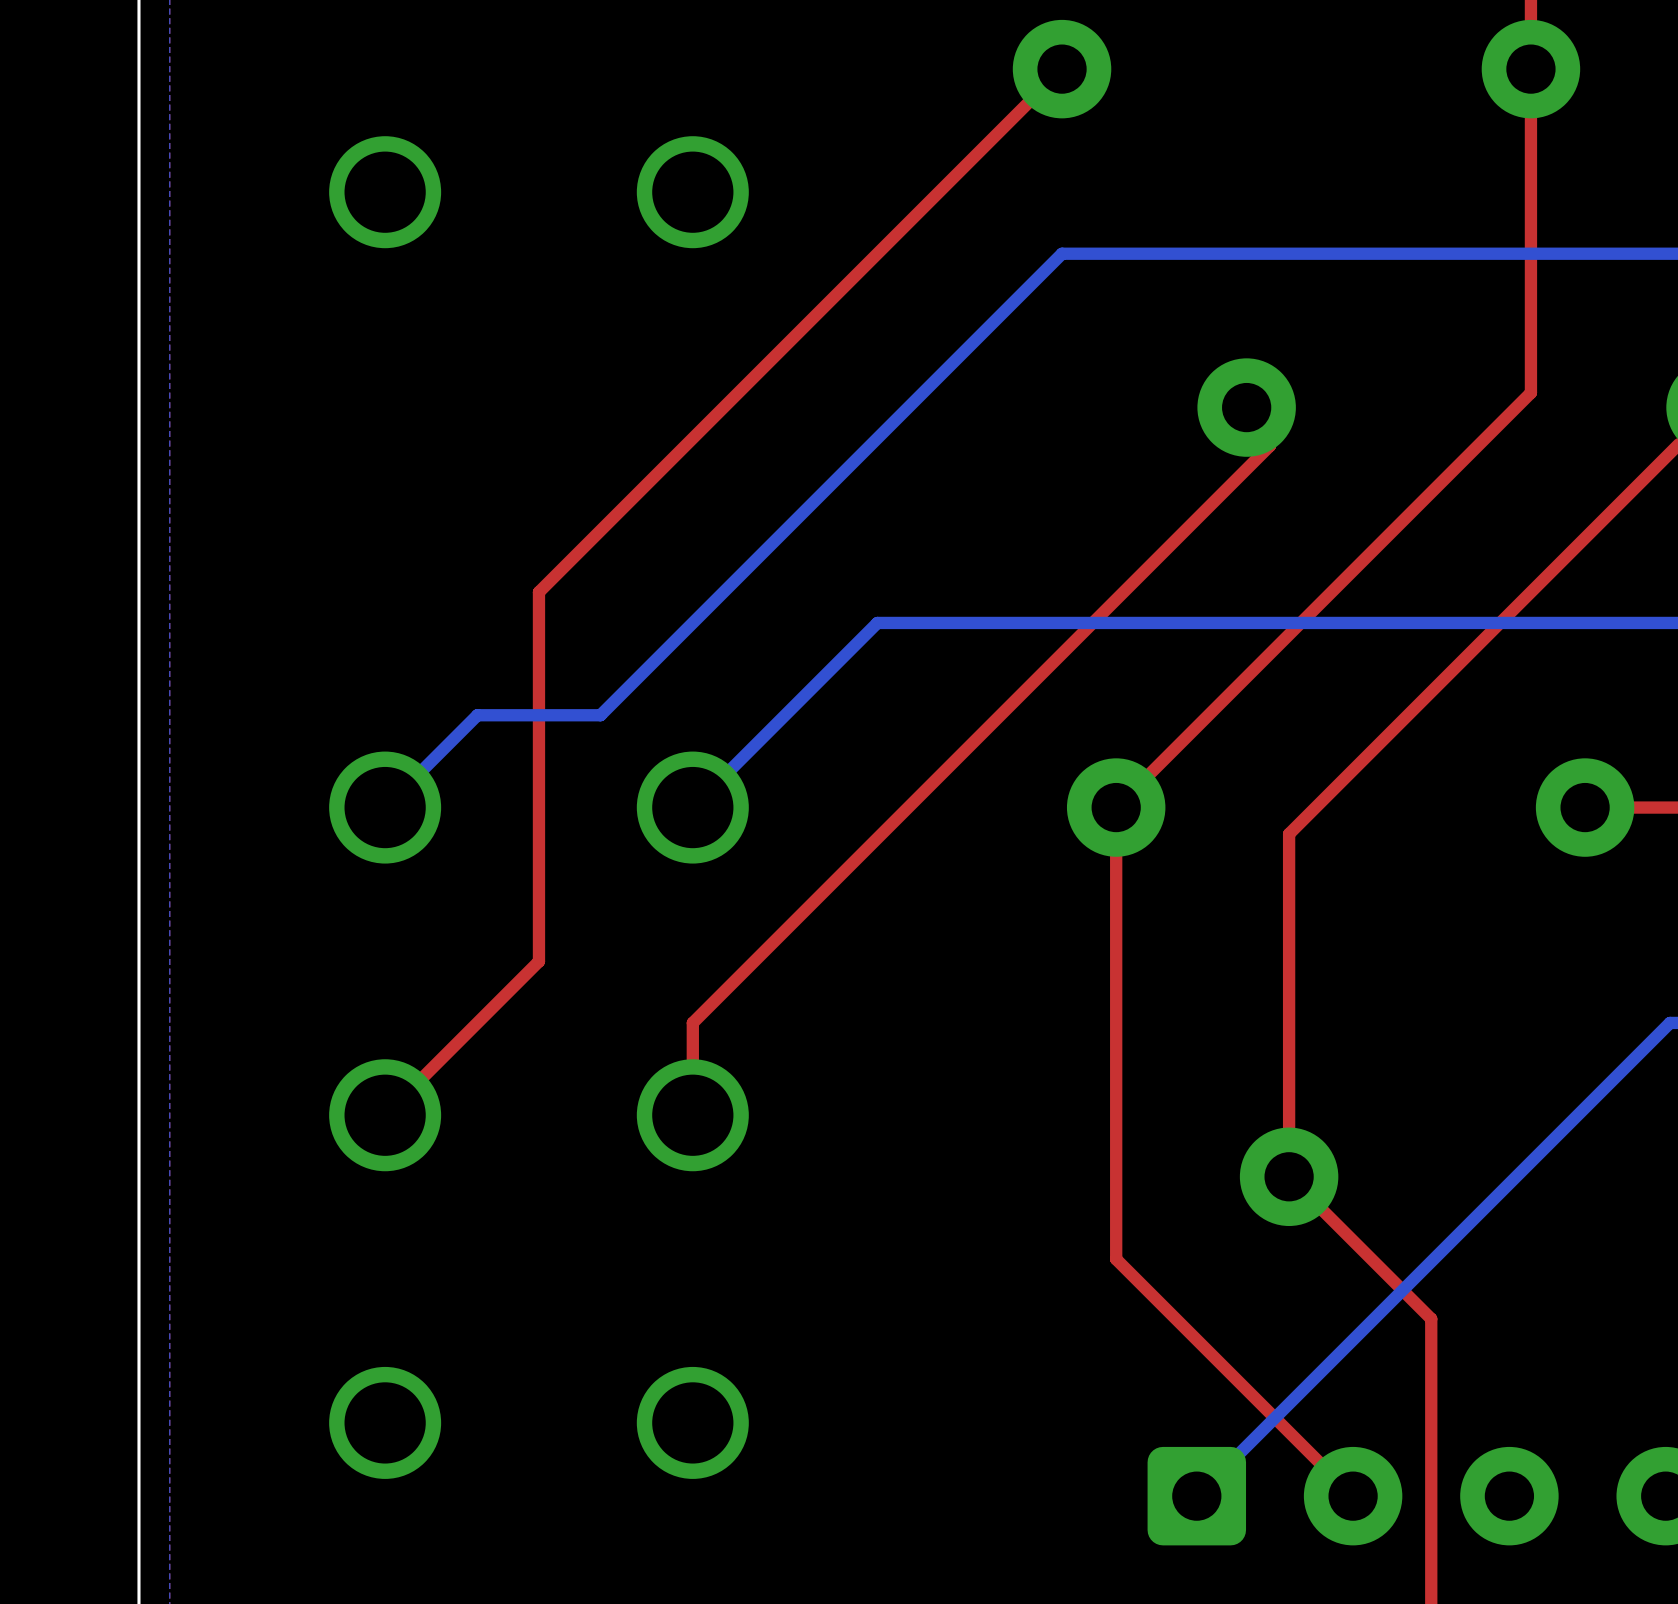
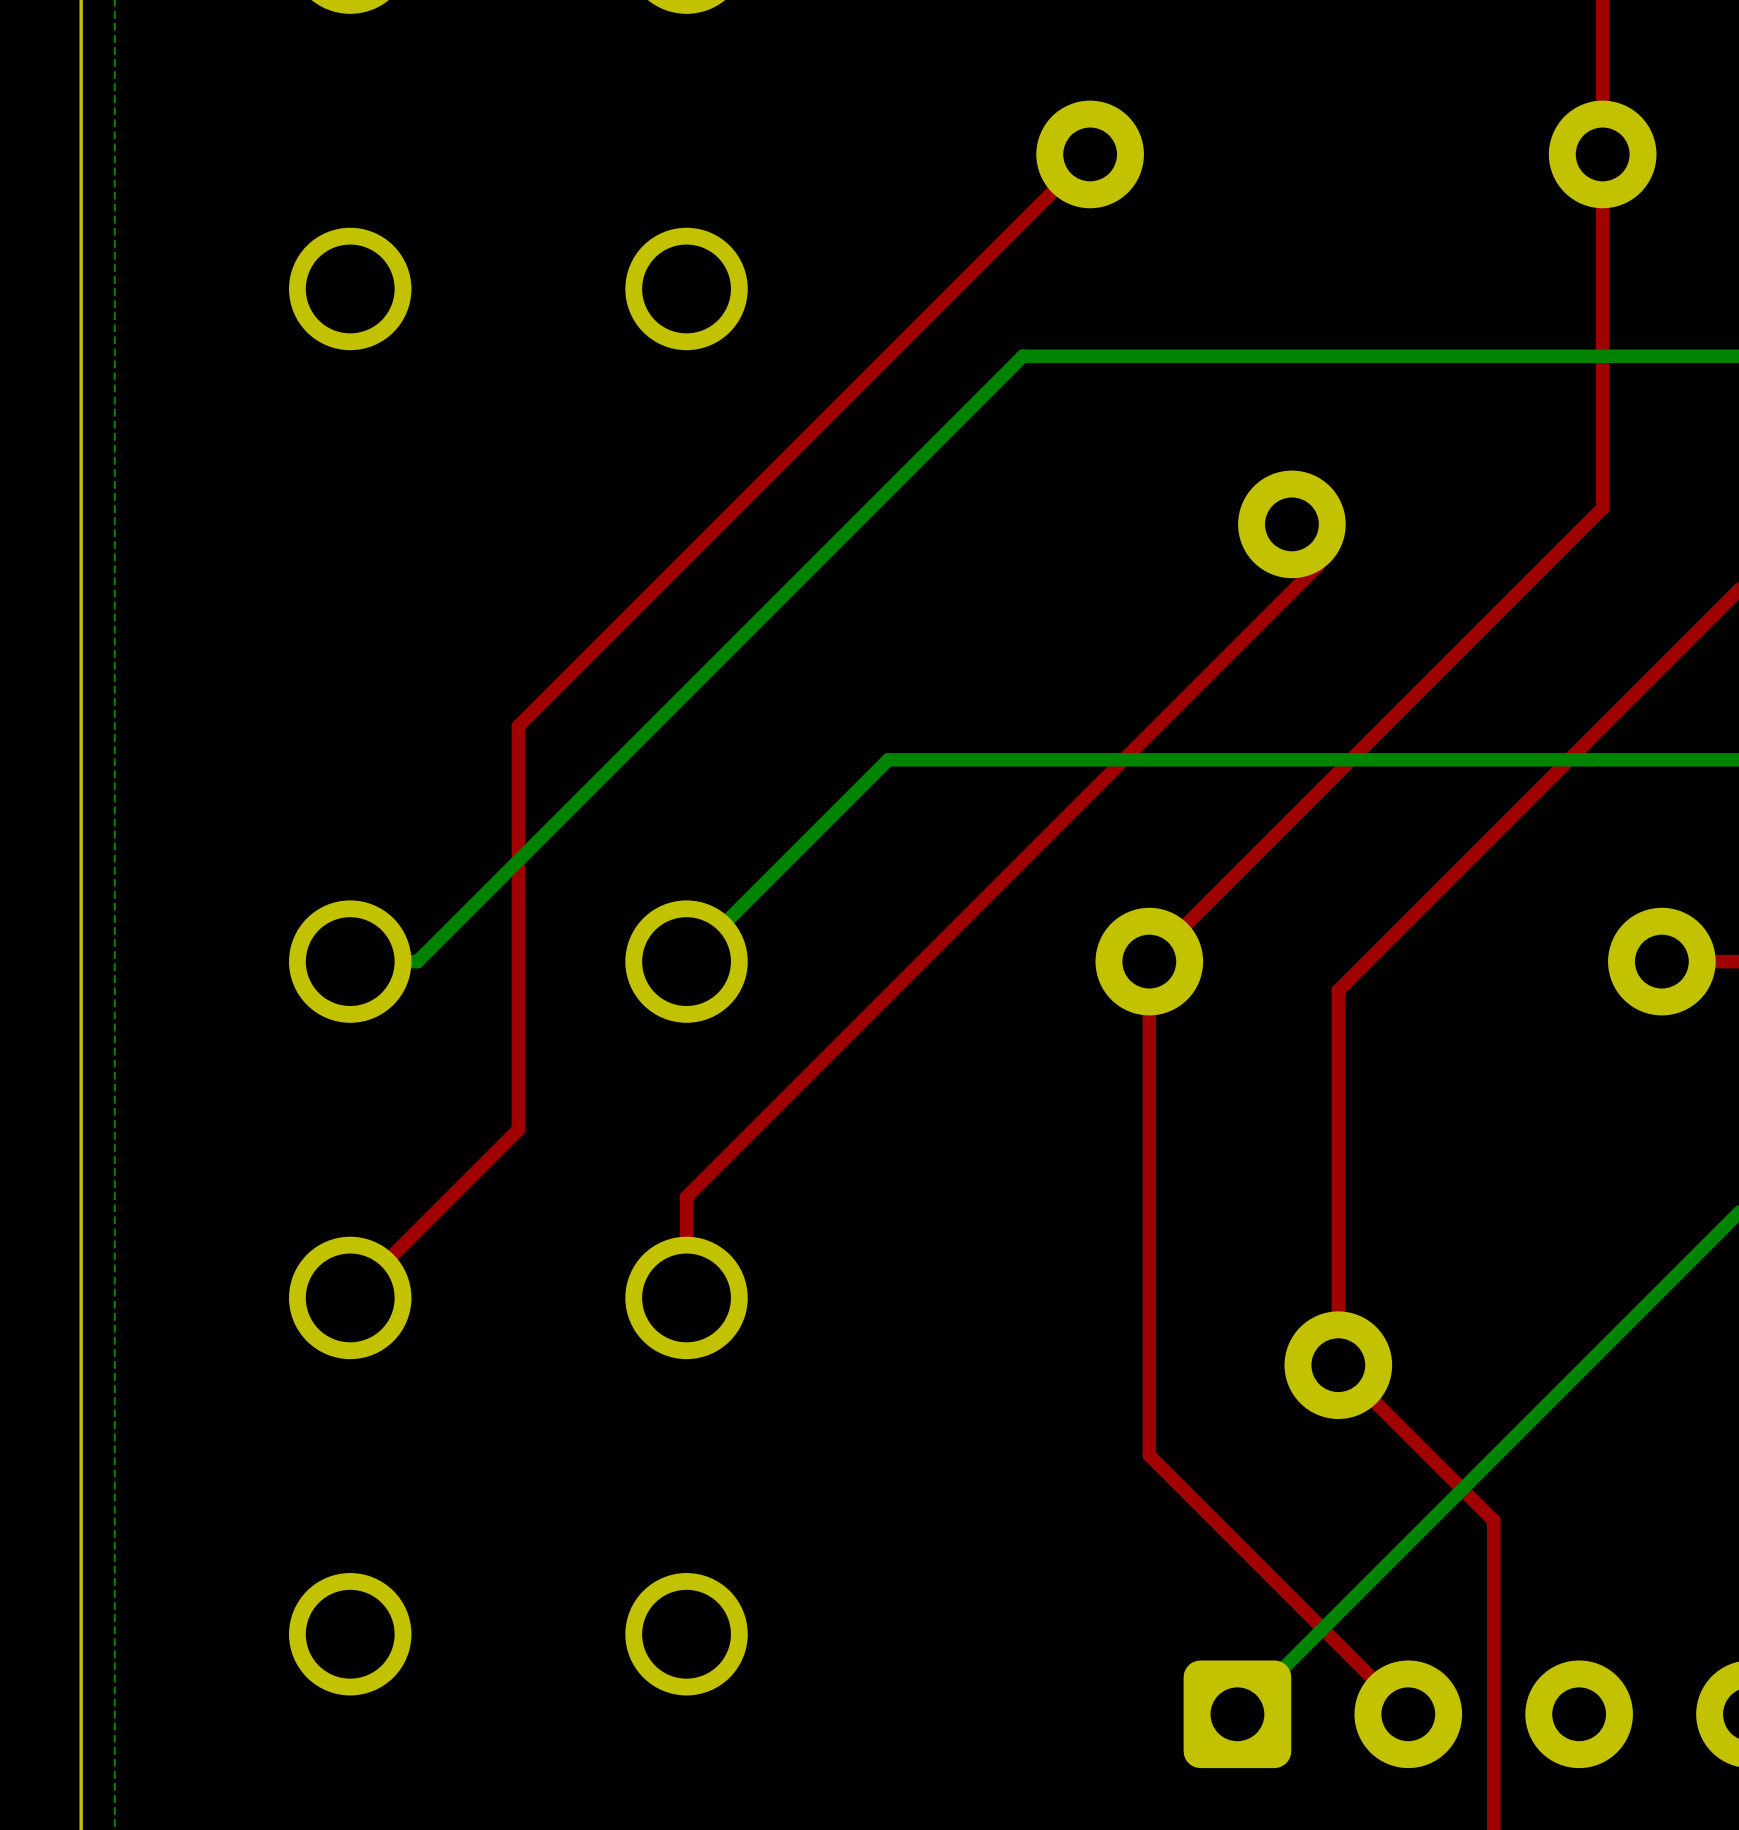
bottom track: (1062, 253) (600, 715) (477, 715) (385, 807) -> (1090, 356) (1022, 356) (417, 961) (350, 961)

